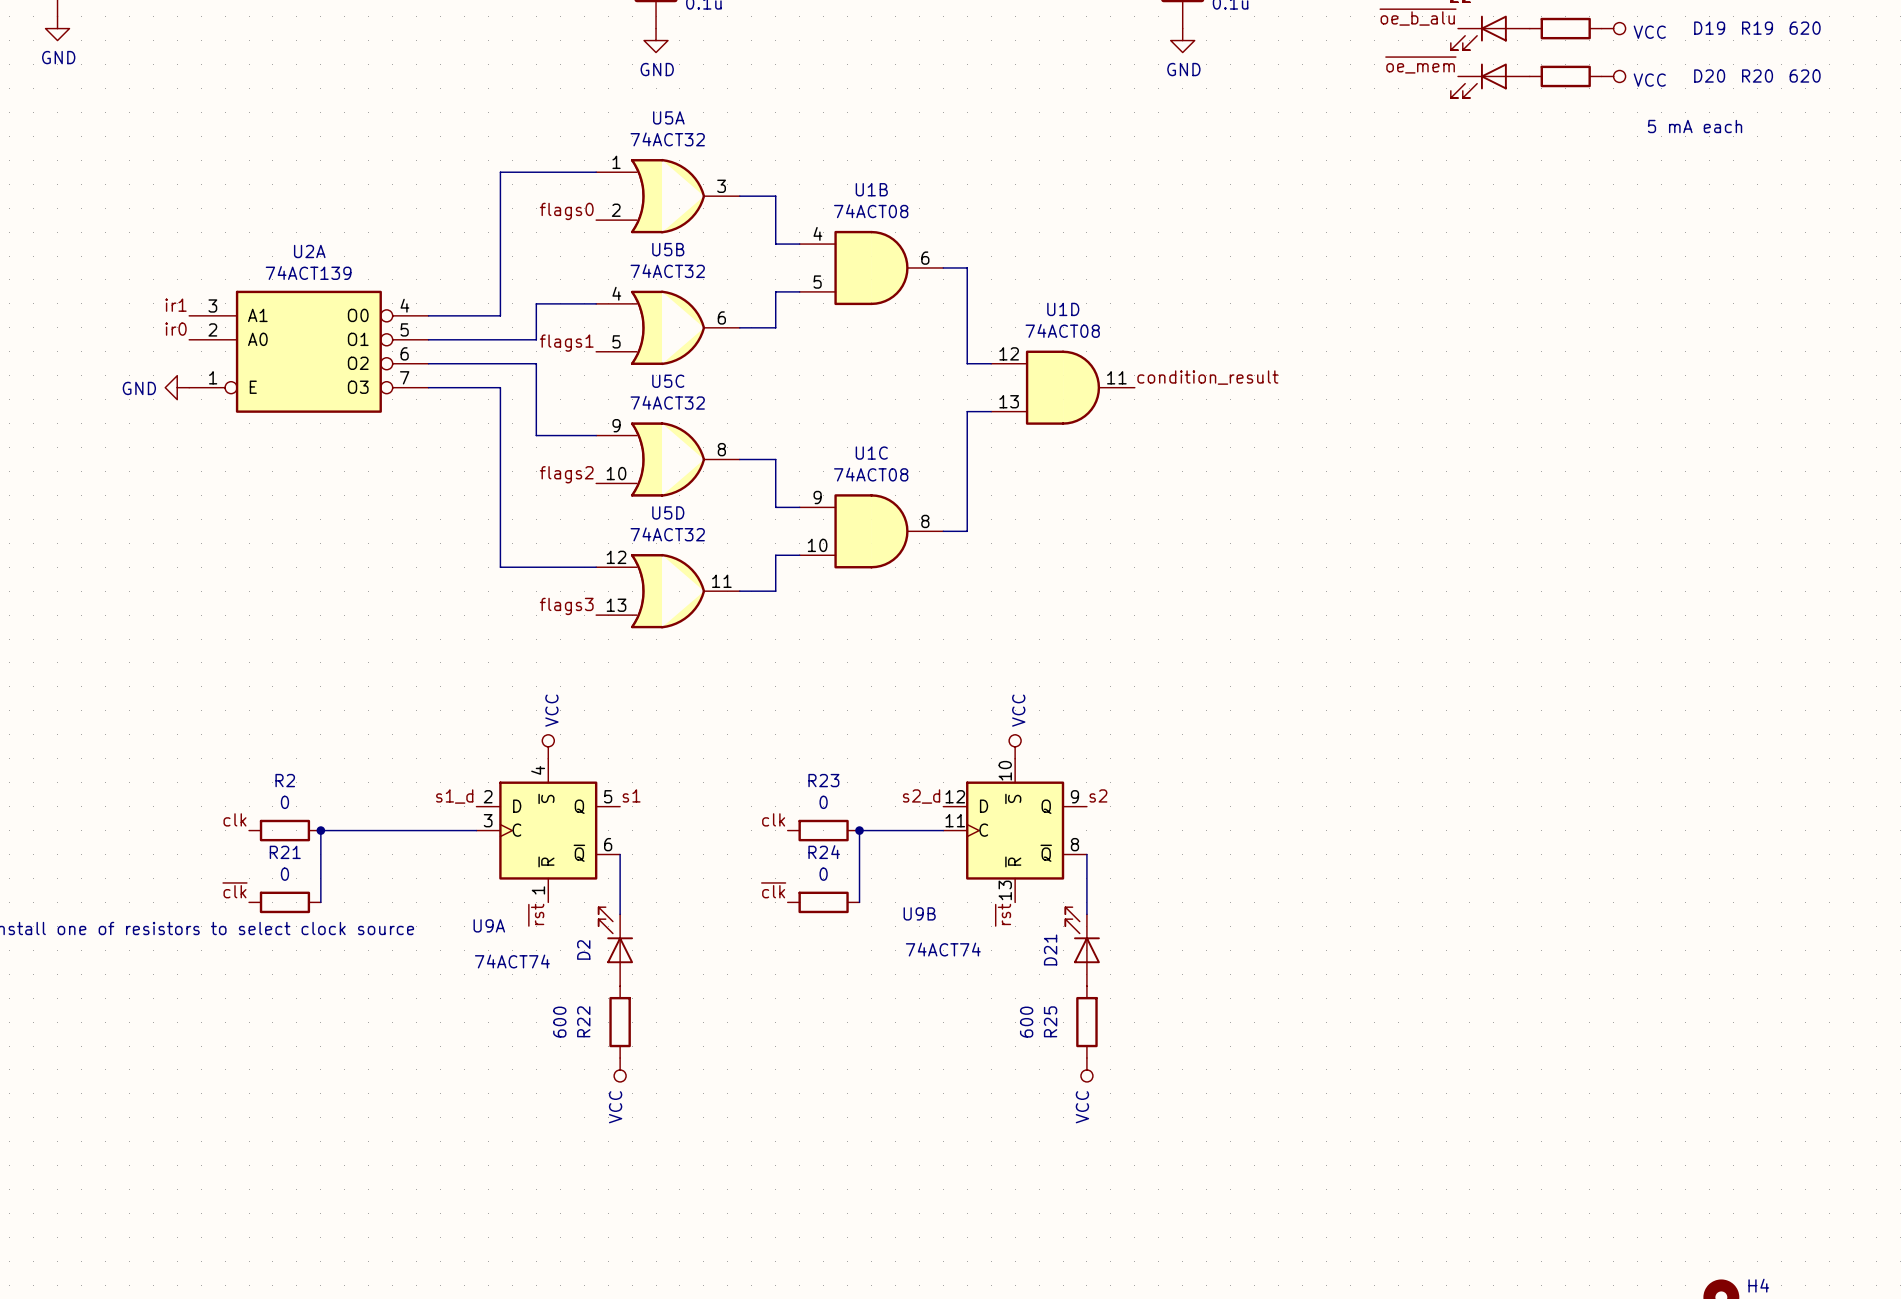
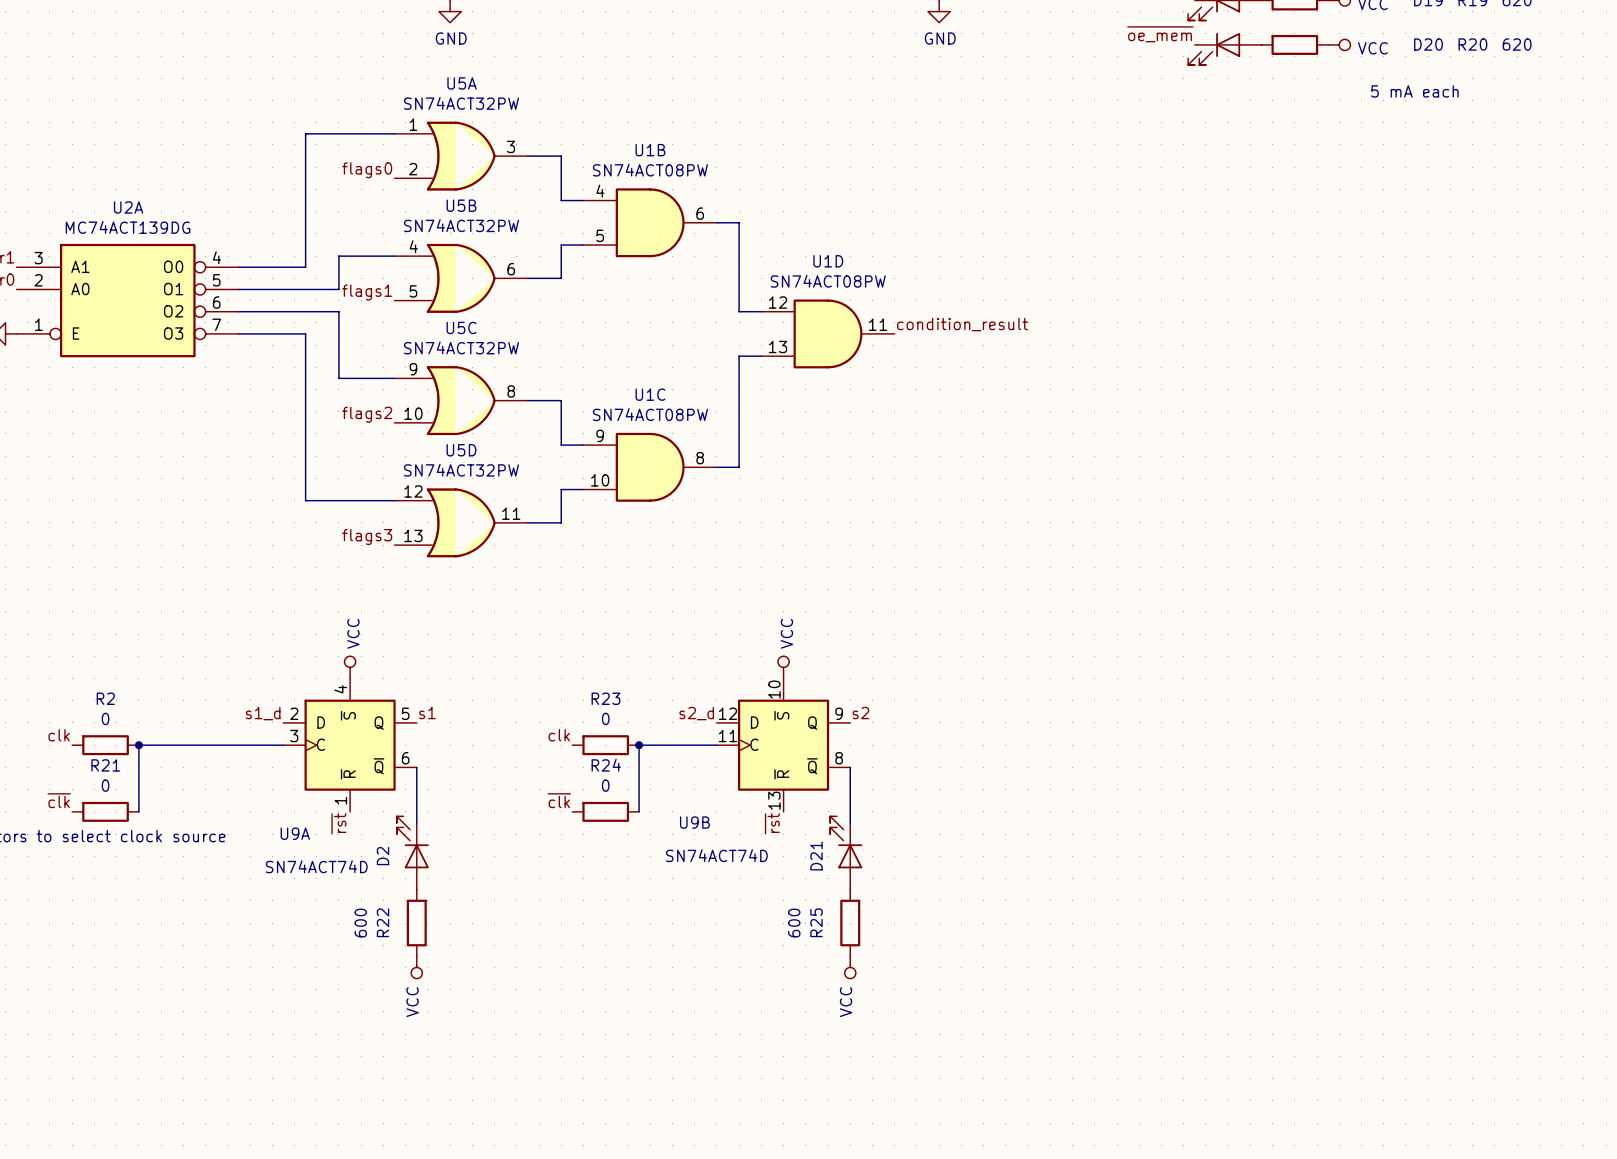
U5A value: 74ACT32 (667, 139) -> SN74ACT32PW (461, 103)
U1B value: 74ACT08 (871, 211) -> SN74ACT08PW (650, 170)
U5B value: 74ACT32 (667, 271) -> SN74ACT32PW (461, 225)
U2A value: 74ACT139 (308, 273) -> MC74ACT139DG (128, 227)
U1D value: 74ACT08 (1062, 330) -> SN74ACT08PW (828, 281)
U5C value: 74ACT32 (667, 402) -> SN74ACT32PW (461, 347)
U1C value: 74ACT08 (871, 474) -> SN74ACT08PW (650, 414)
U5D value: 74ACT32 (667, 534) -> SN74ACT32PW (461, 470)
U9B value: 74ACT74 (943, 949) -> SN74ACT74D (716, 855)
U9A value: 74ACT74 (512, 961) -> SN74ACT74D (316, 866)

